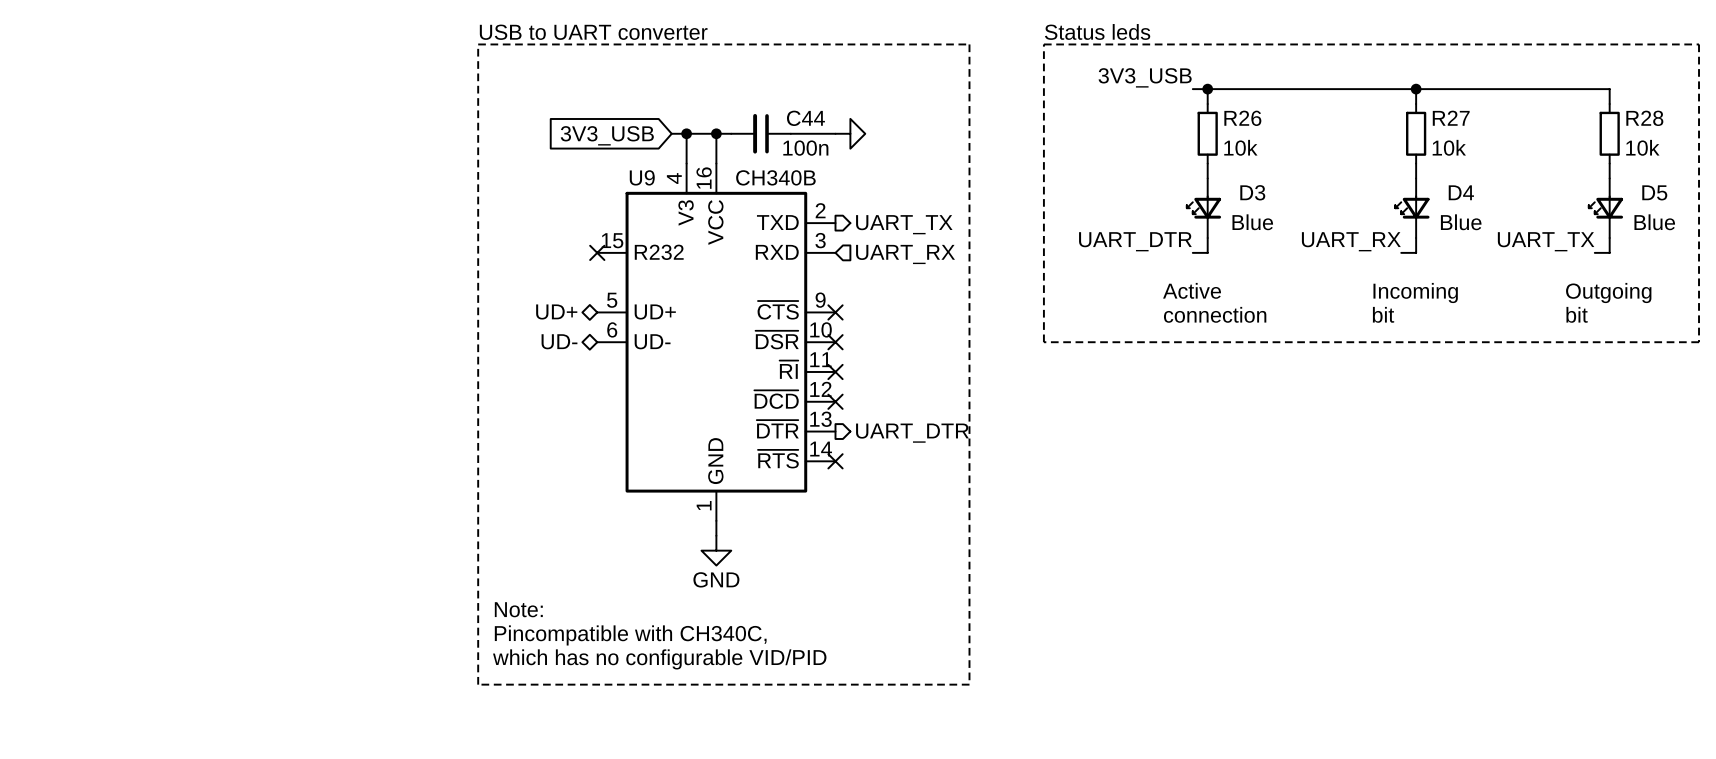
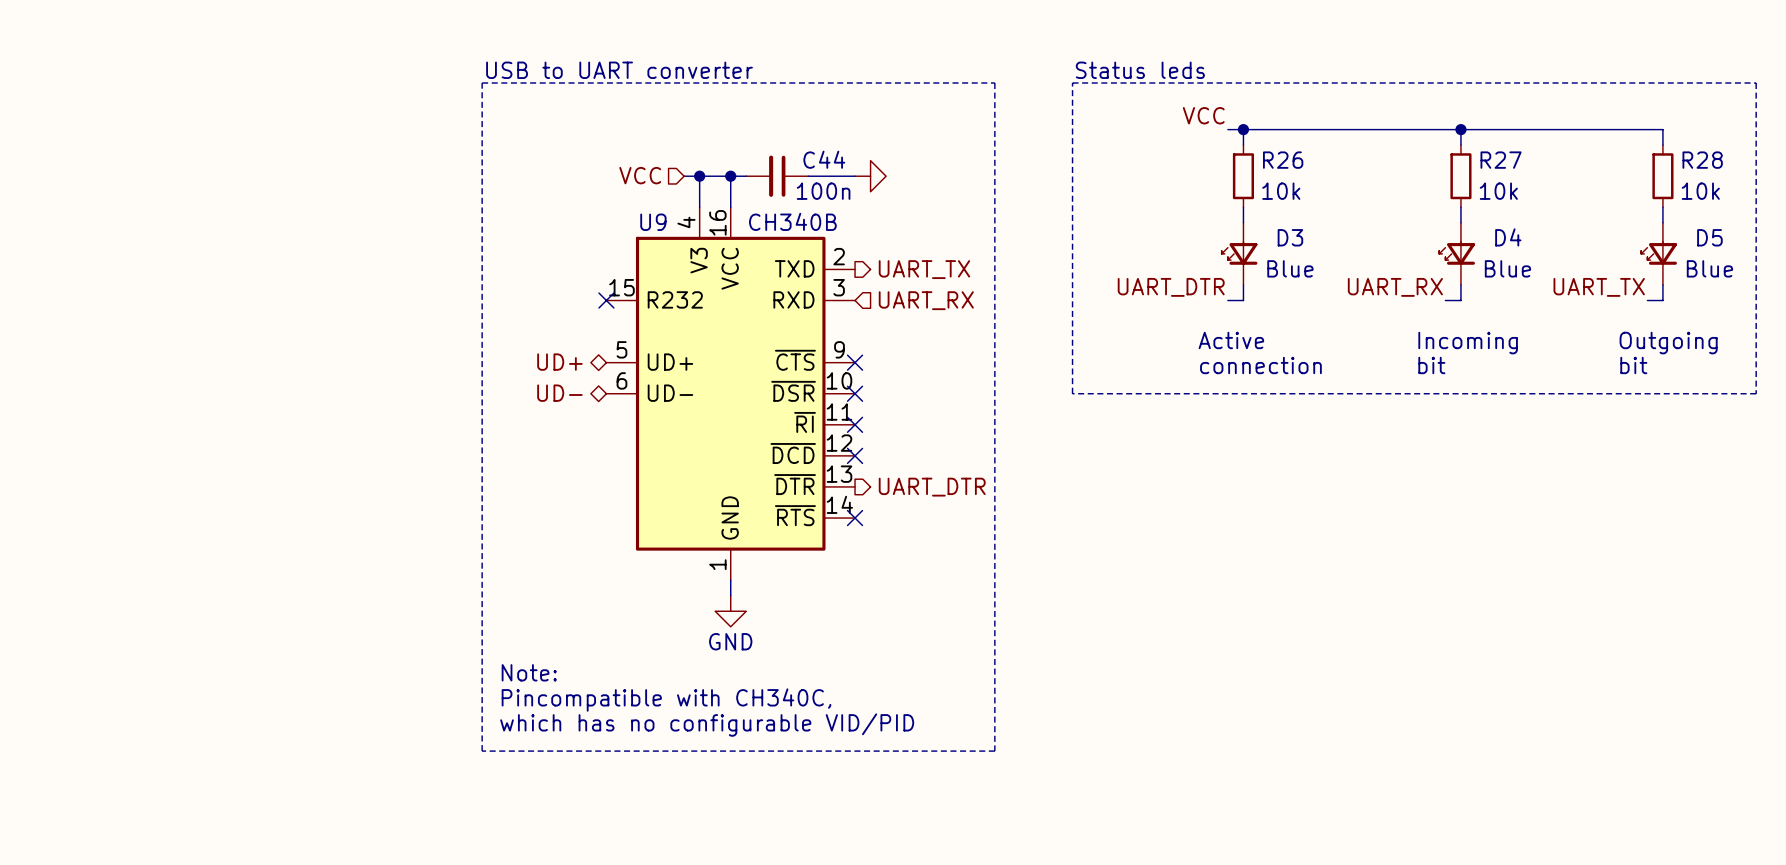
label: 3V3_USB (1145, 77) -> VCC (1203, 115)
hierarchical label: none -> VCC (640, 175)
global label: 3V3_USB (607, 135) -> none

